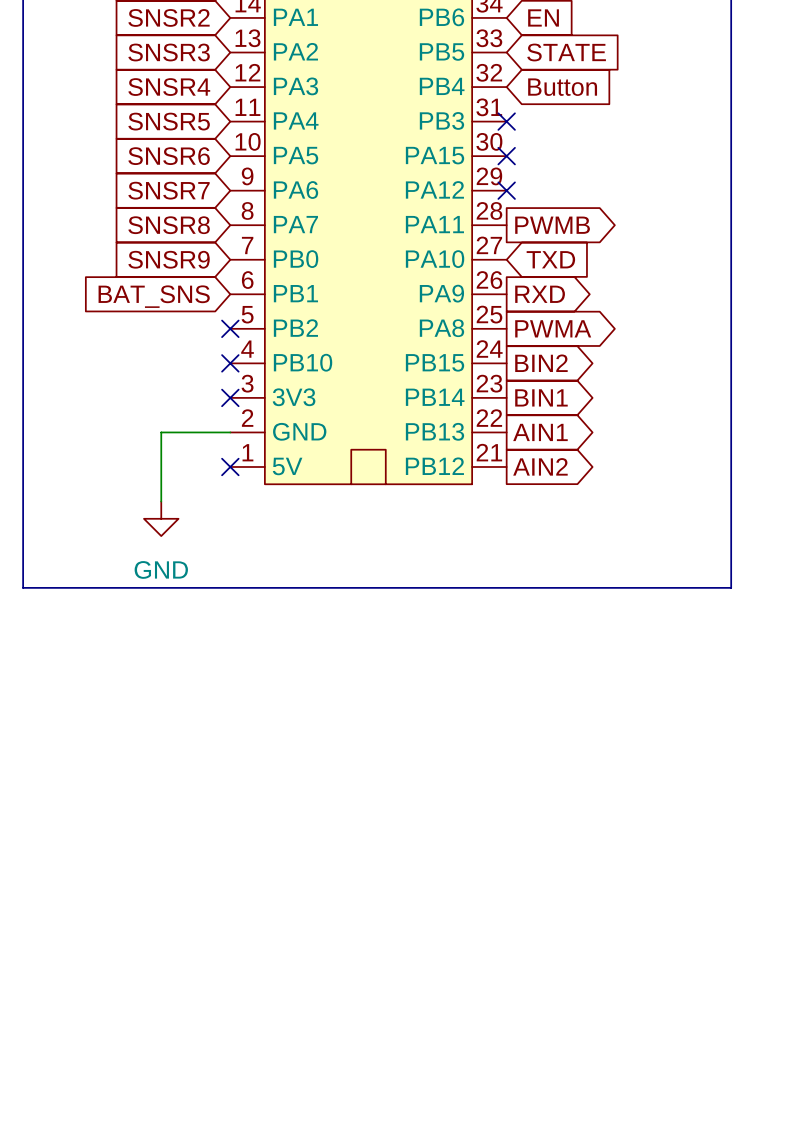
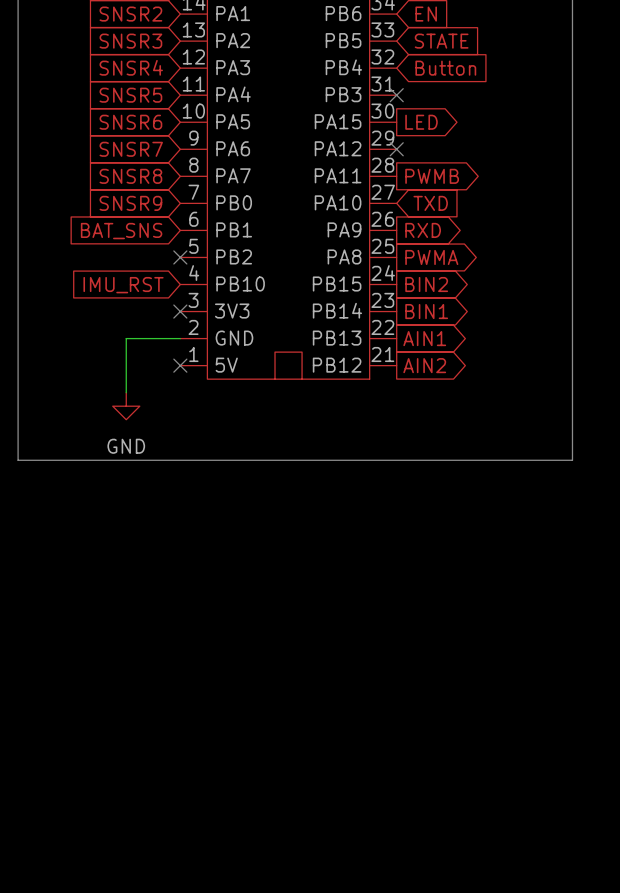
no-connect mark: (506, 156) -> none
global label: none -> LED (421, 122)
no-connect mark: (230, 363) -> none
global label: none -> IMU_RST (123, 285)

